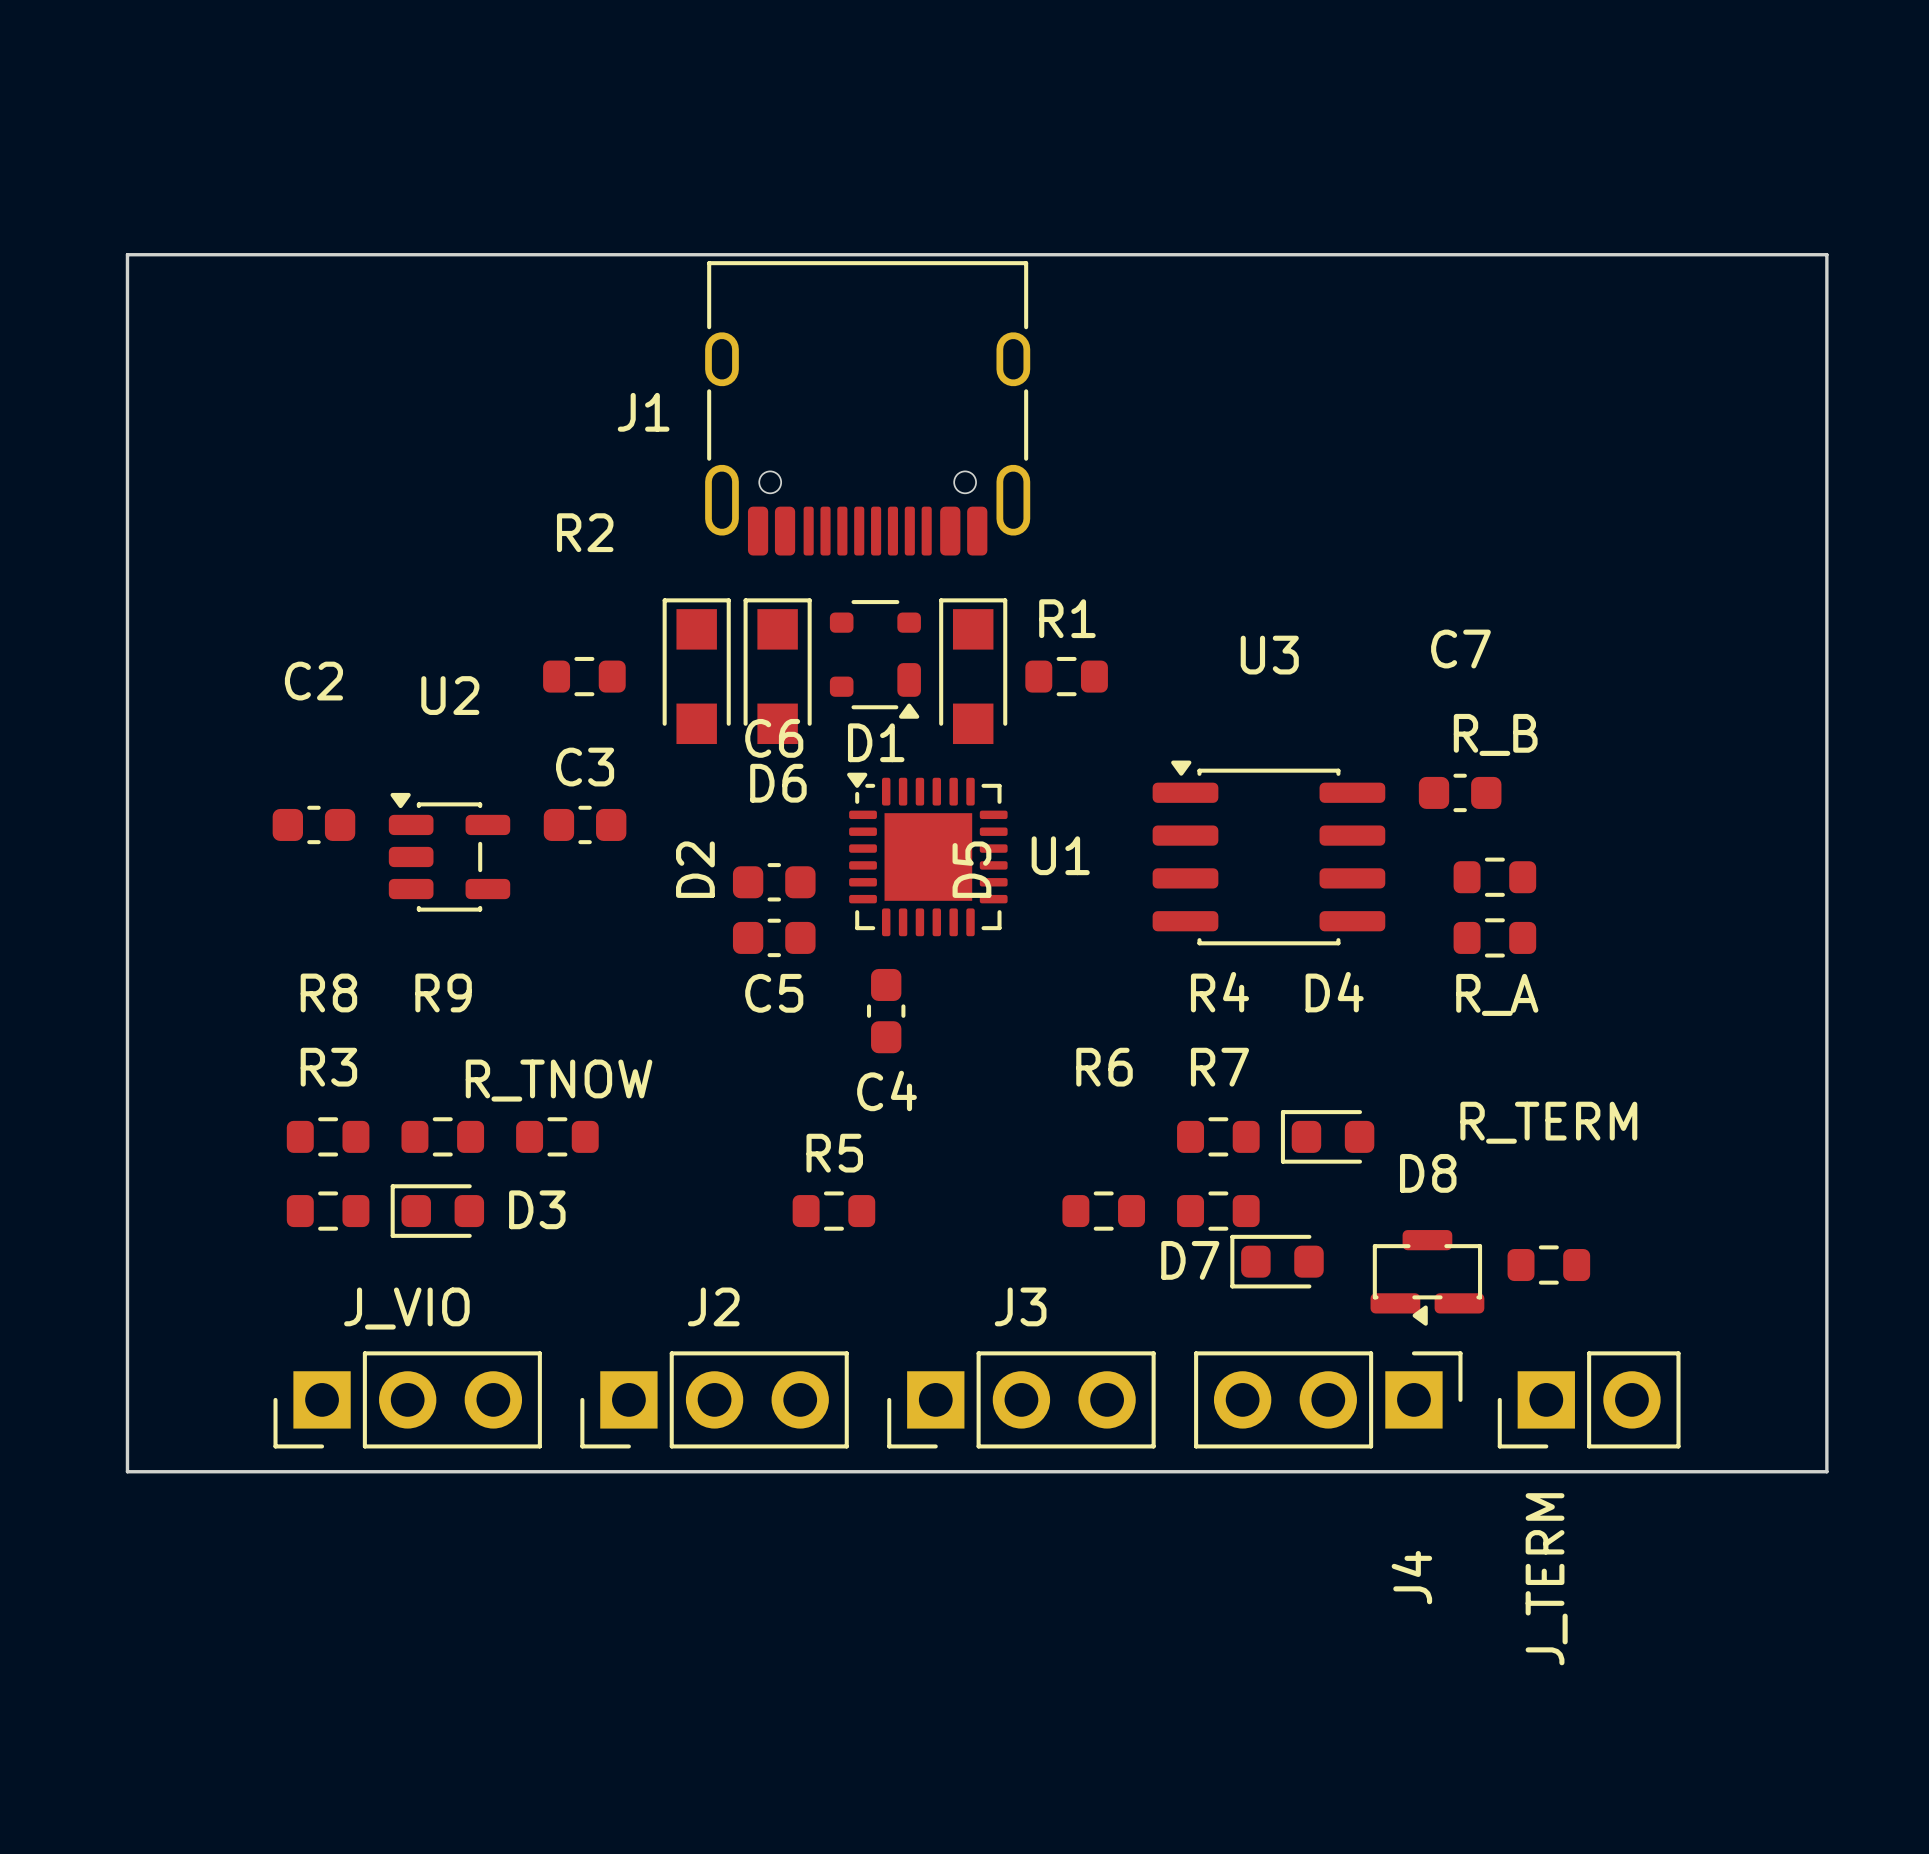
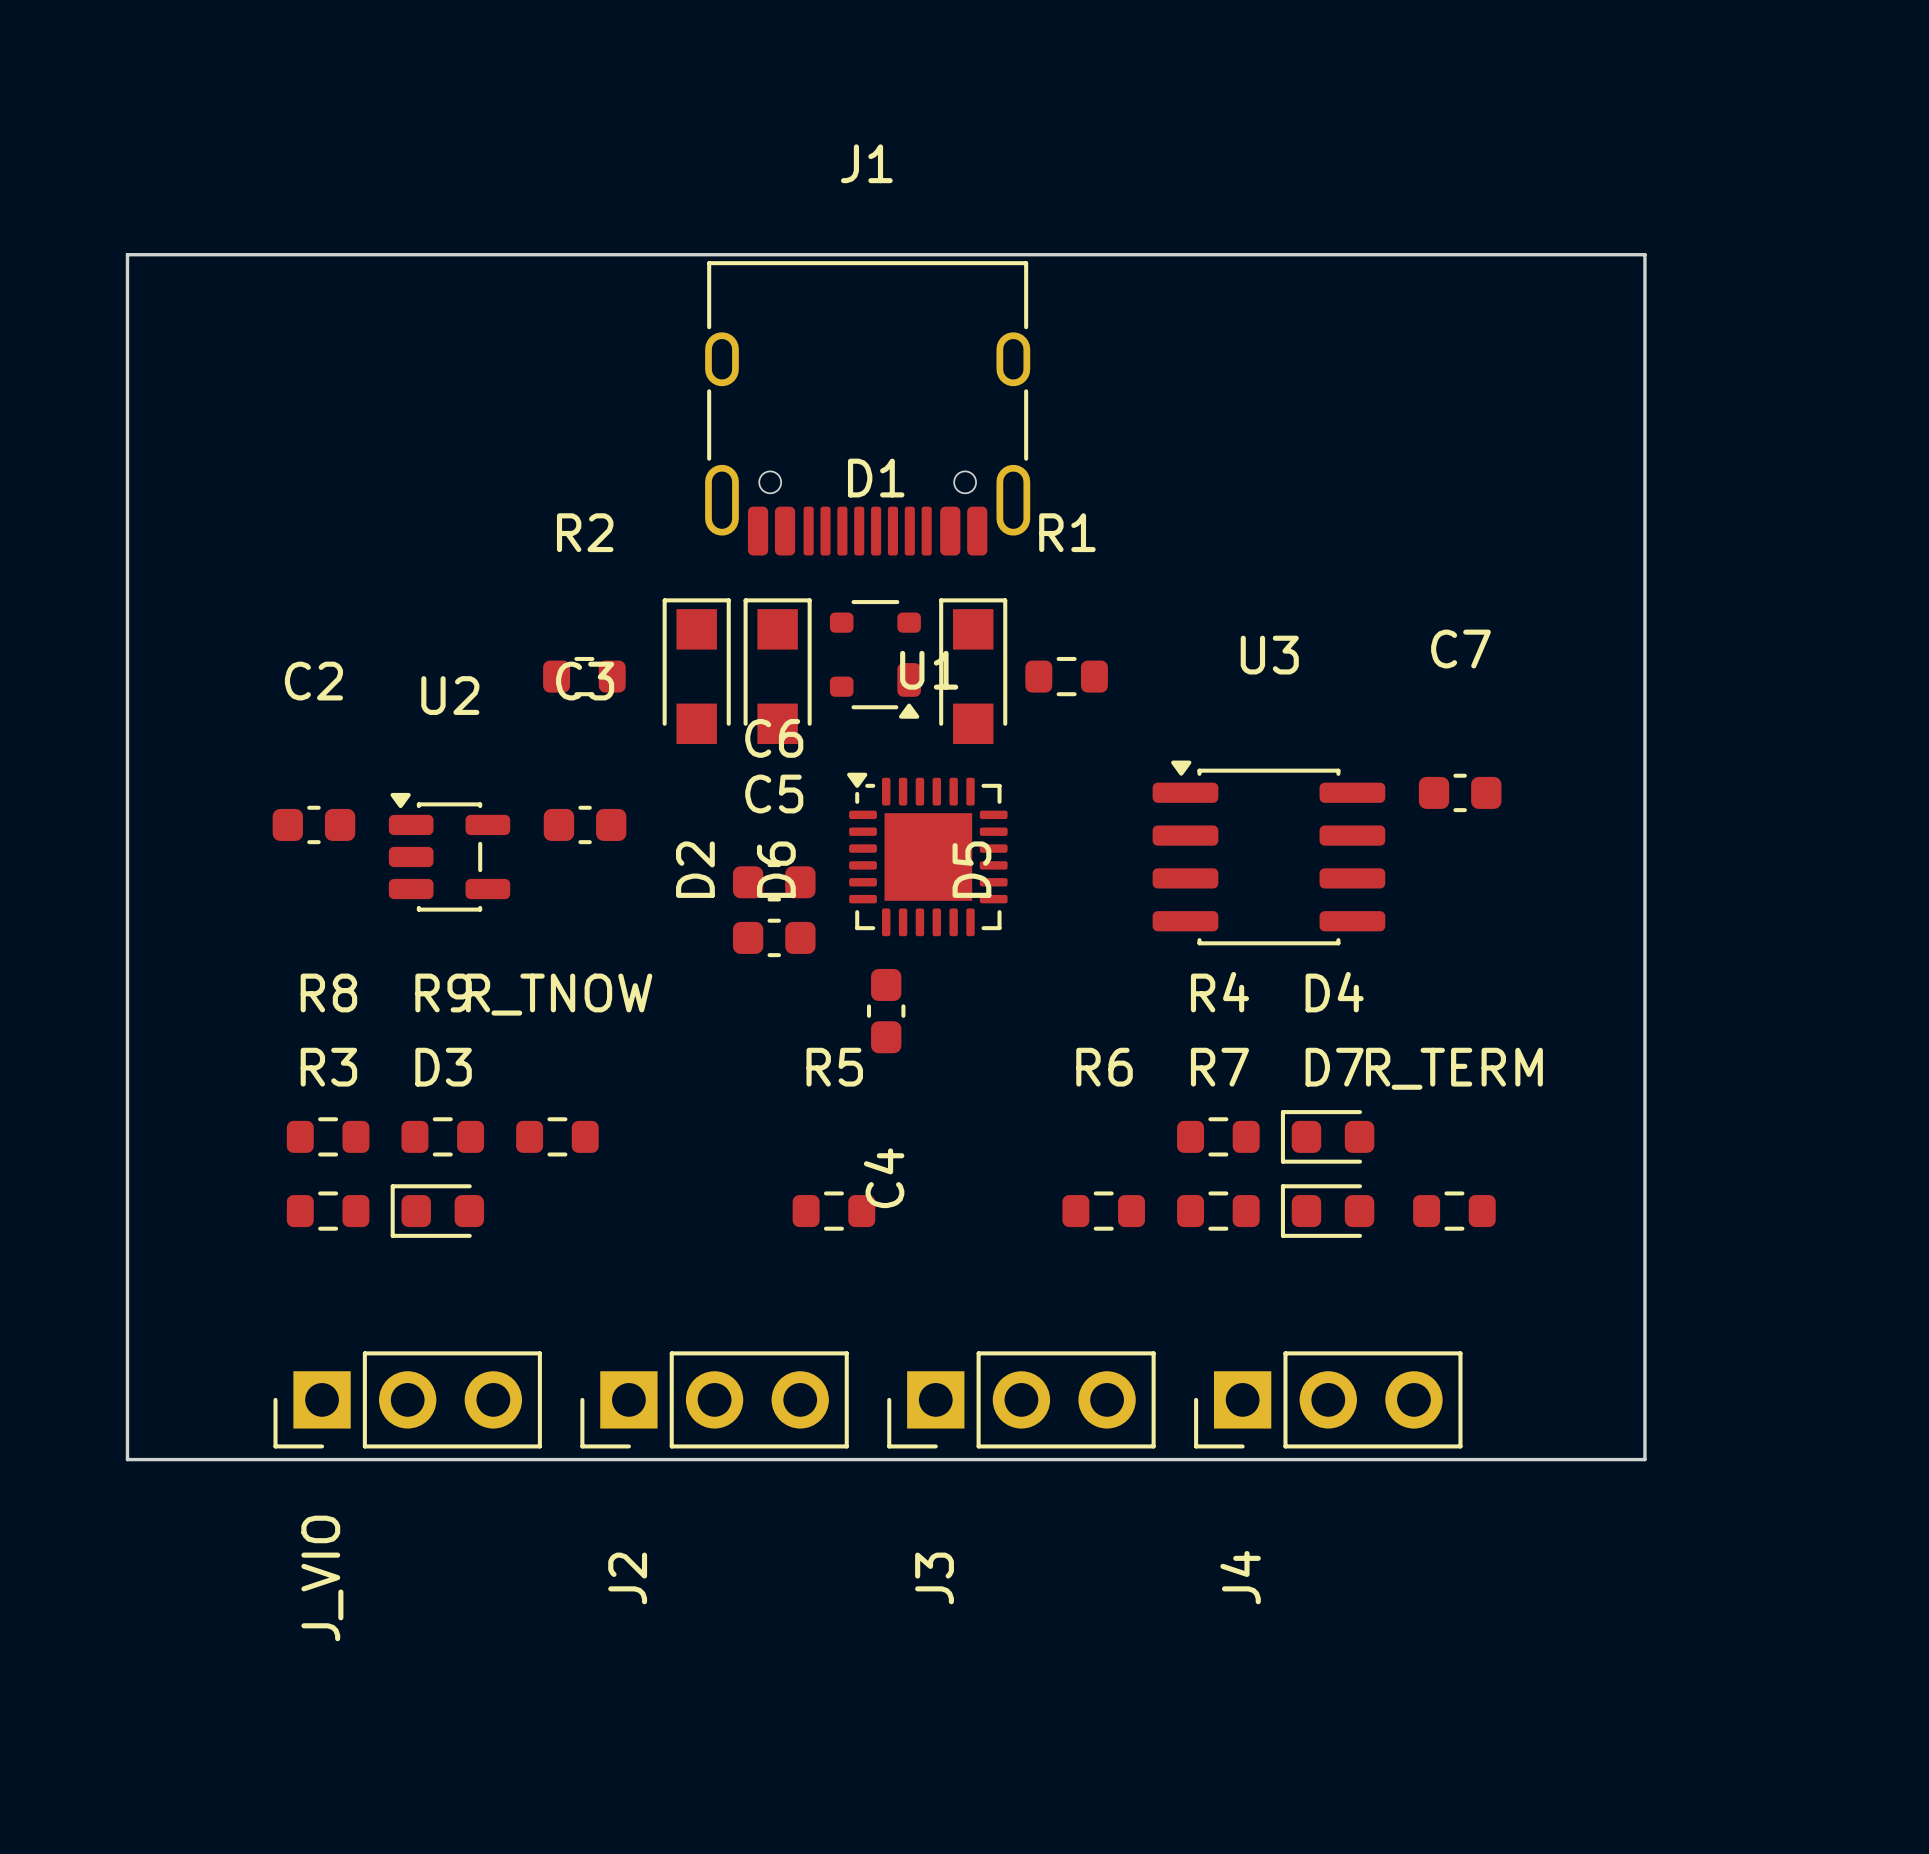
board edge: (1644, 254) (1826, 254) (1826, 1471) (127, 1471) (127, 1459) -> (1644, 254) (1644, 1459) (127, 1459)
J1 name position: J1 (643, 412) -> J1 (866, 163)
R1 name position: R1 (1067, 618) -> R1 (1067, 532)
D1 name position: D1 (876, 742) -> D1 (876, 478)
C3 name position: C3 (585, 767) -> C3 (585, 681)
D6 name rotation: 0° (778, 783) -> 90° counterclockwise (776, 869)
D6 name position: D6 (778, 783) -> D6 (776, 869)
U1 name position: U1 (1060, 855) -> U1 (929, 670)
R_B: (1494, 877) -> none
R_A: (1494, 937) -> none
C5 name position: C5 (774, 993) -> C5 (774, 794)
R_TNOW name position: R_TNOW (559, 1080) -> R_TNOW (559, 994)
C4 name rotation: 0° (887, 1090) -> 90° counterclockwise (884, 1178)
C4 name position: C4 (887, 1090) -> C4 (884, 1178)
R5 name position: R5 (834, 1153) -> R5 (834, 1067)
D3 name position: D3 (537, 1209) -> D3 (443, 1067)
D7 name position: D7 (1190, 1260) -> D7 (1334, 1067)
D7 position: (1277, 1261) -> (1327, 1211)
R_TERM position: (1548, 1265) -> (1454, 1211)
D8: (1427, 1277) -> none
J2 name rotation: 0° (713, 1306) -> 90° counterclockwise (627, 1578)
J2 name position: J2 (713, 1306) -> J2 (627, 1578)
J3 name rotation: 0° (1020, 1306) -> 90° counterclockwise (934, 1578)
J3 name position: J3 (1020, 1306) -> J3 (934, 1578)
J_VIO name rotation: 0° (406, 1308) -> 90° counterclockwise (322, 1578)
J_VIO name position: J_VIO (406, 1308) -> J_VIO (322, 1578)
J4 rotation: 0° (1328, 1399) -> 180° (1328, 1399)
J_TERM: (1589, 1399) -> none
J4 name position: J4 (1411, 1577) -> J4 (1240, 1577)

